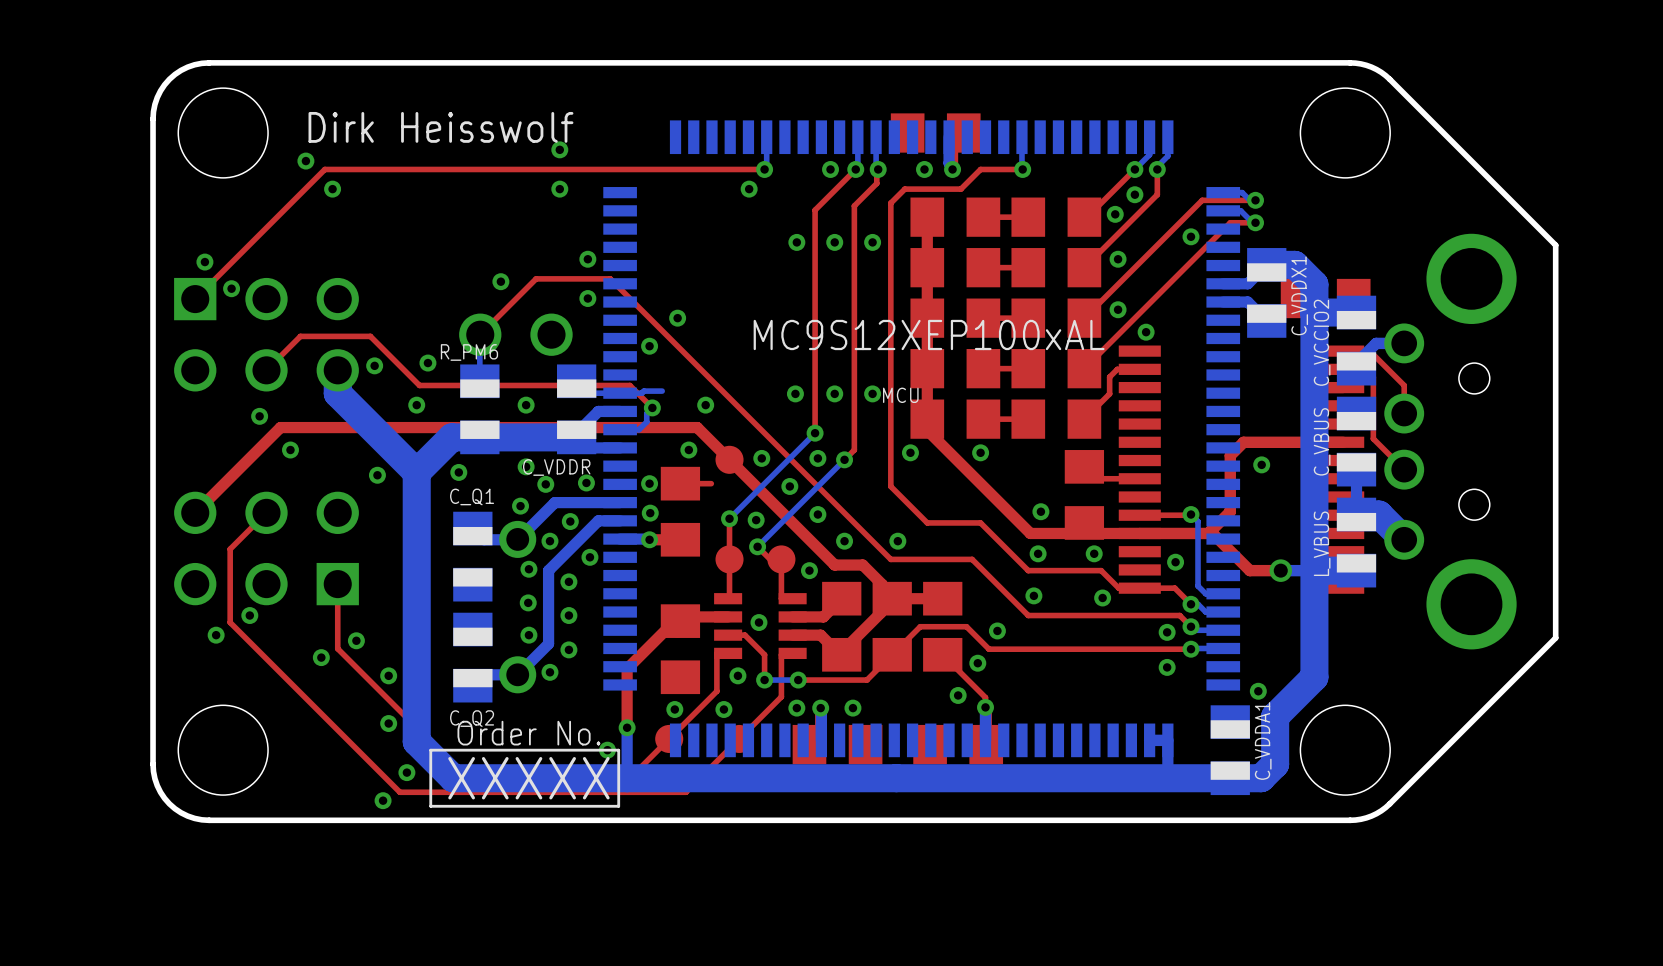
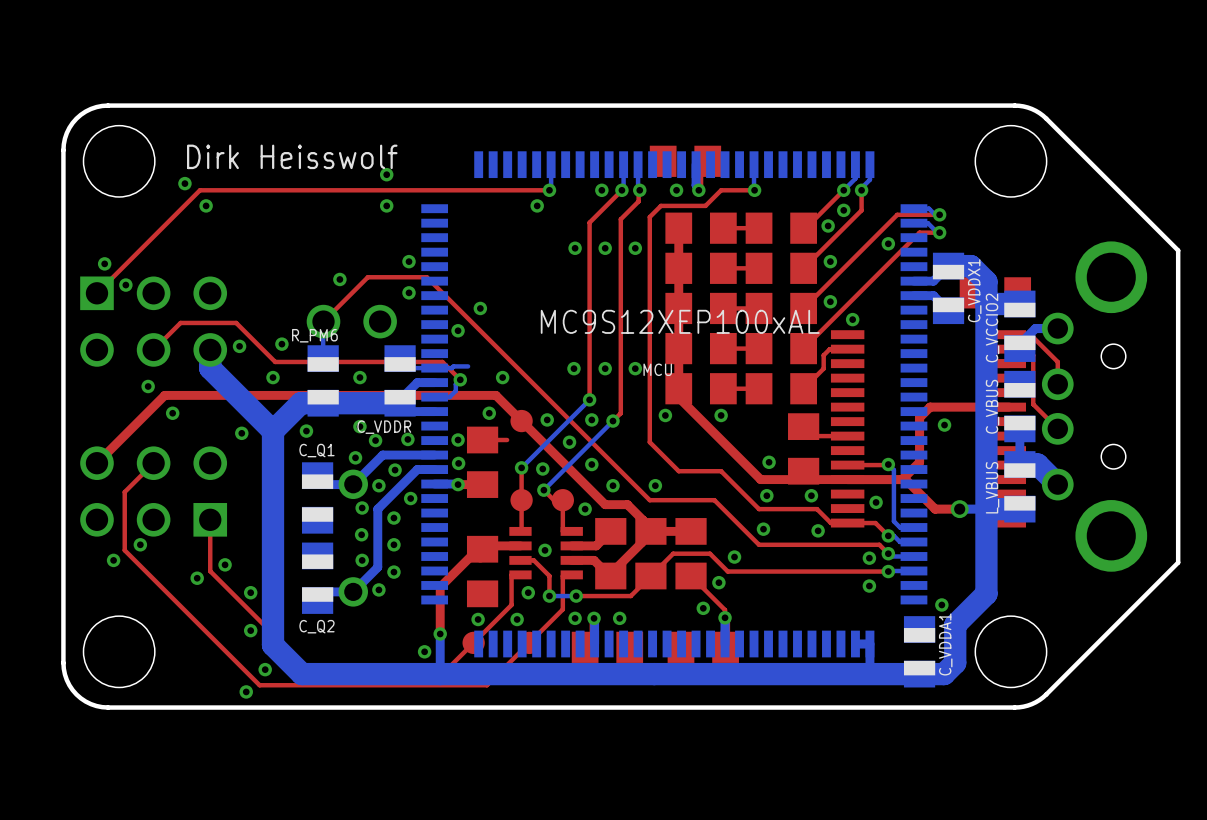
text: Order No. (528, 733) -> none
line: (618, 750) (430, 750) (430, 806) (618, 806) (618, 750) -> none
text: XXXXX (528, 778) -> none

